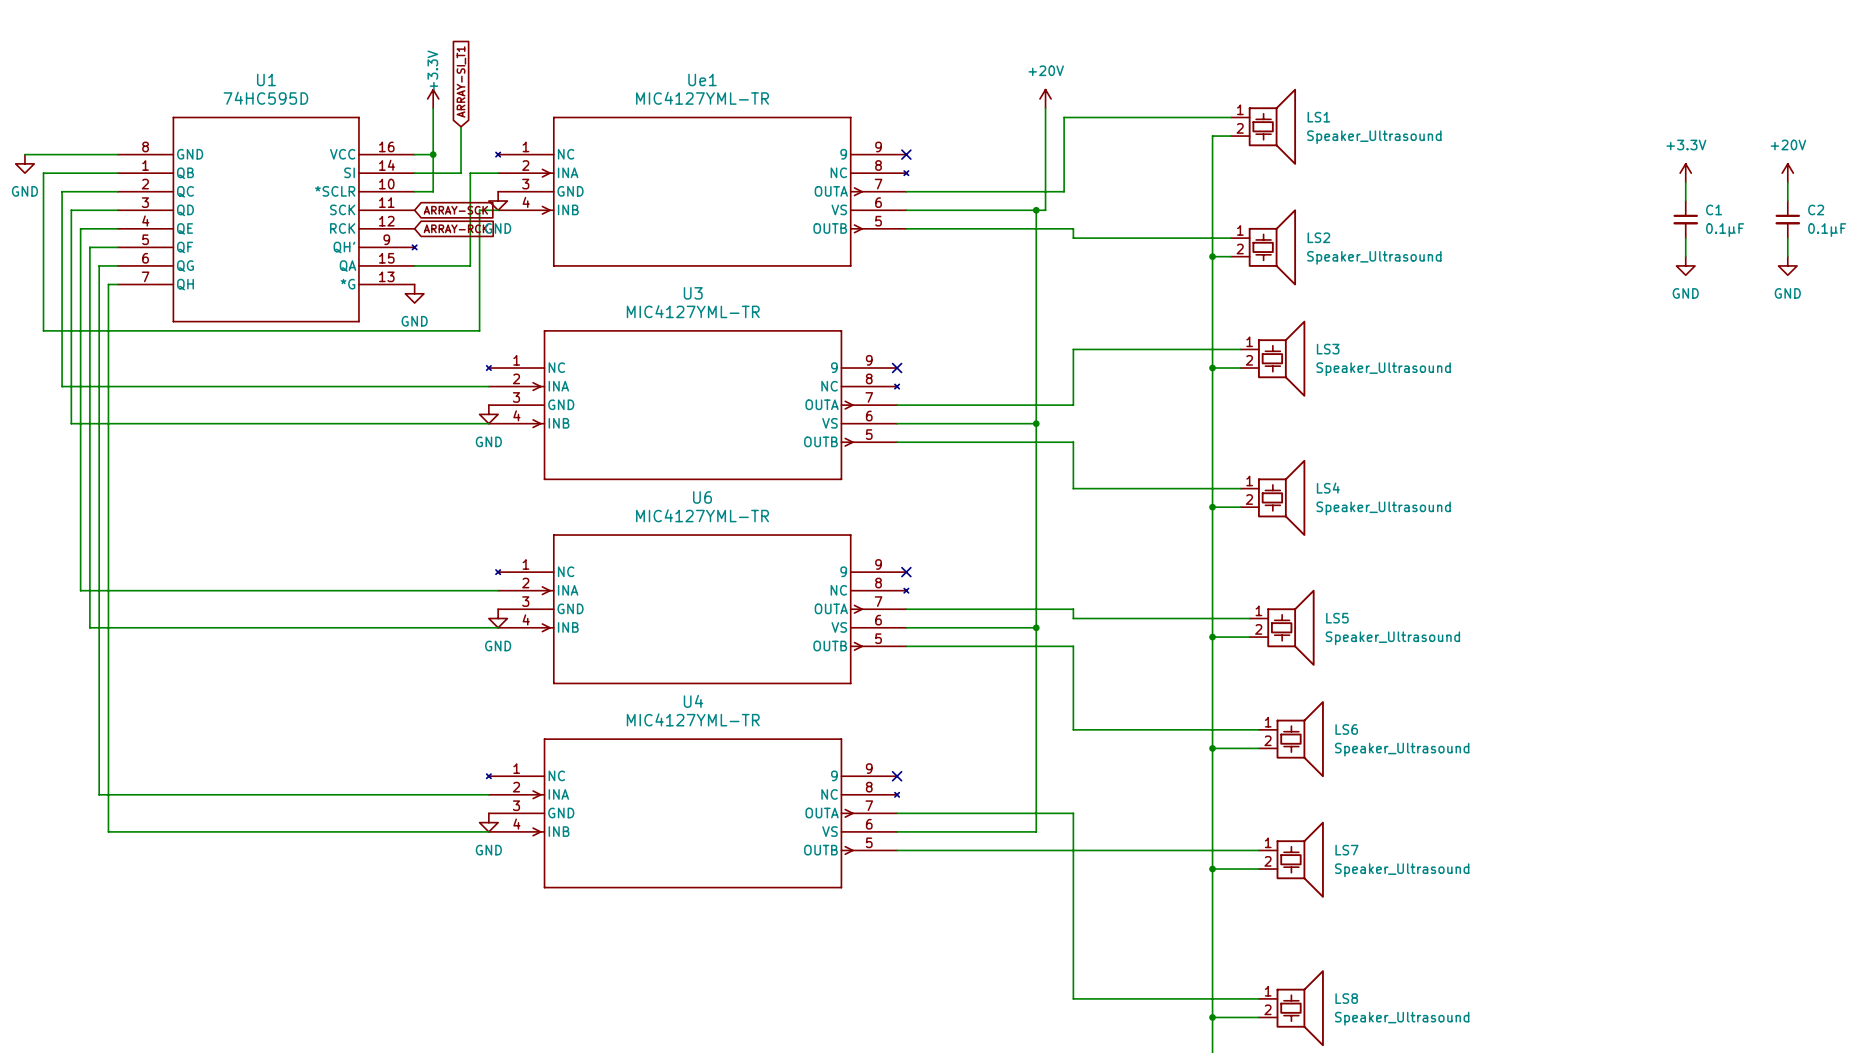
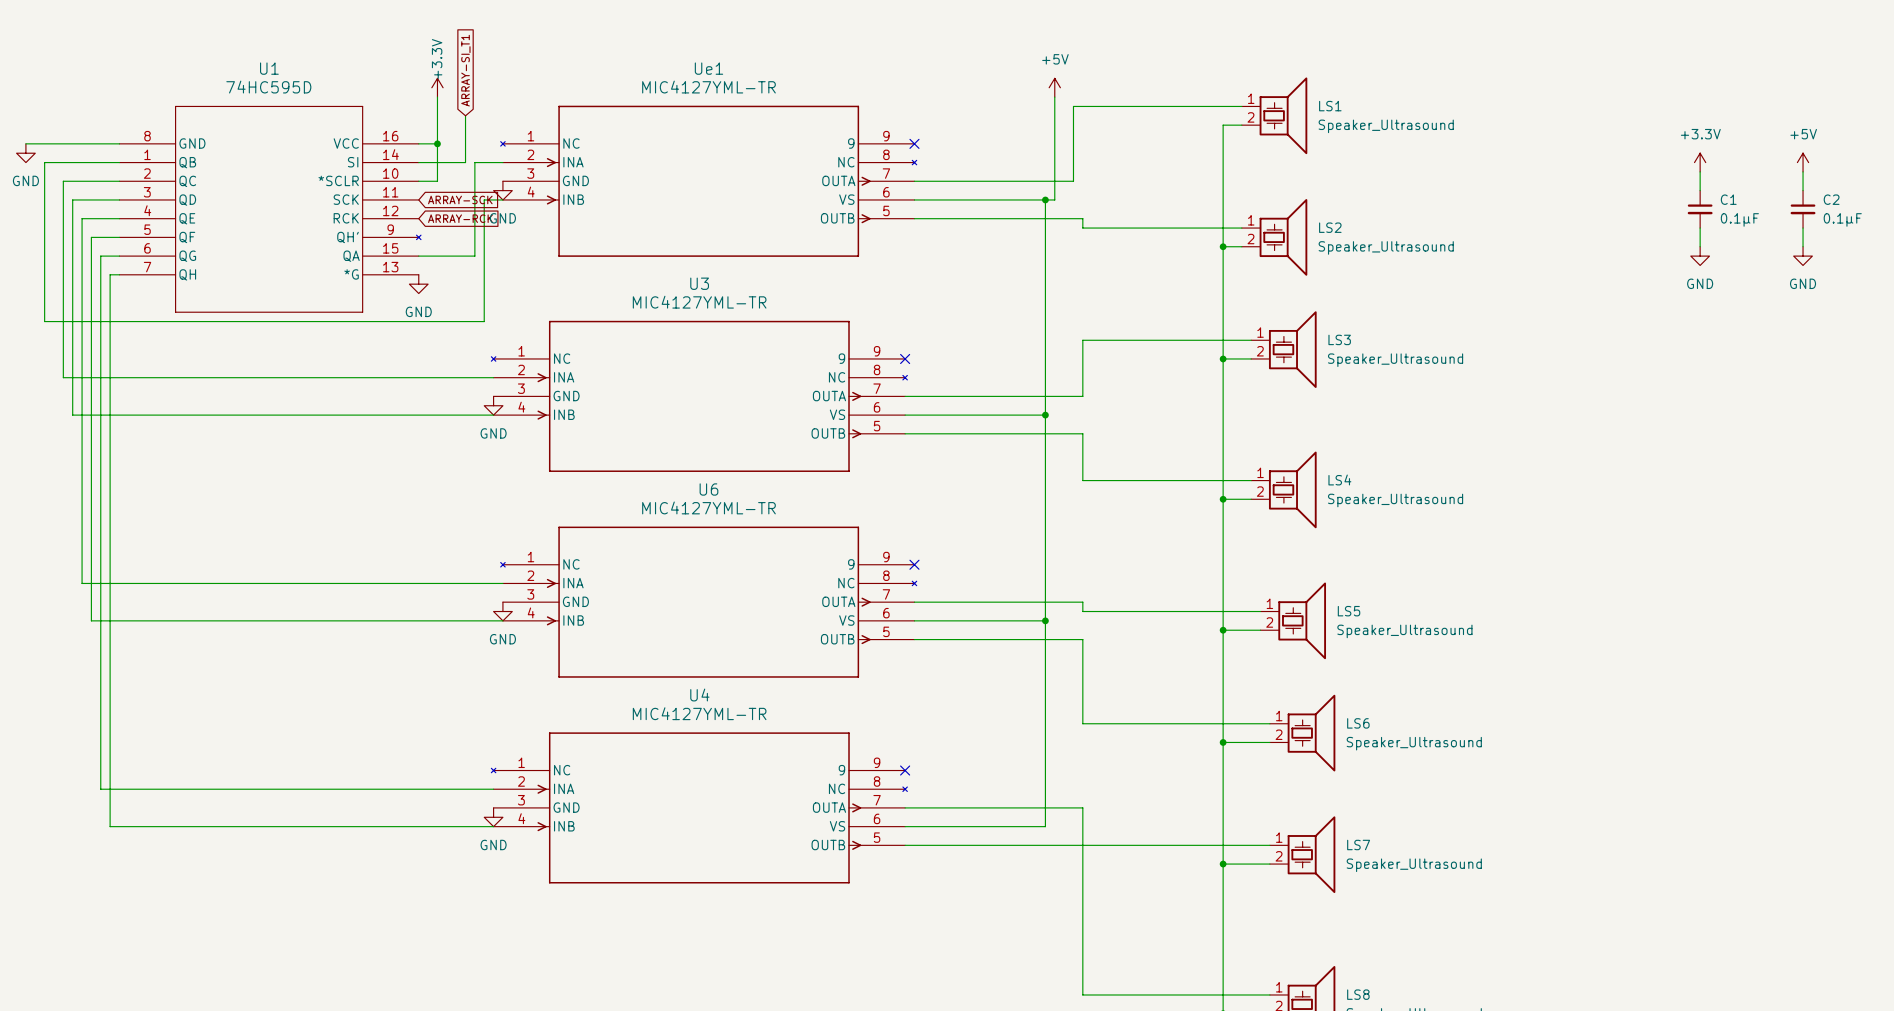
power symbol: +20V (1045, 98) -> +5V (1054, 87)
power symbol: +20V (1787, 173) -> +5V (1803, 162)

